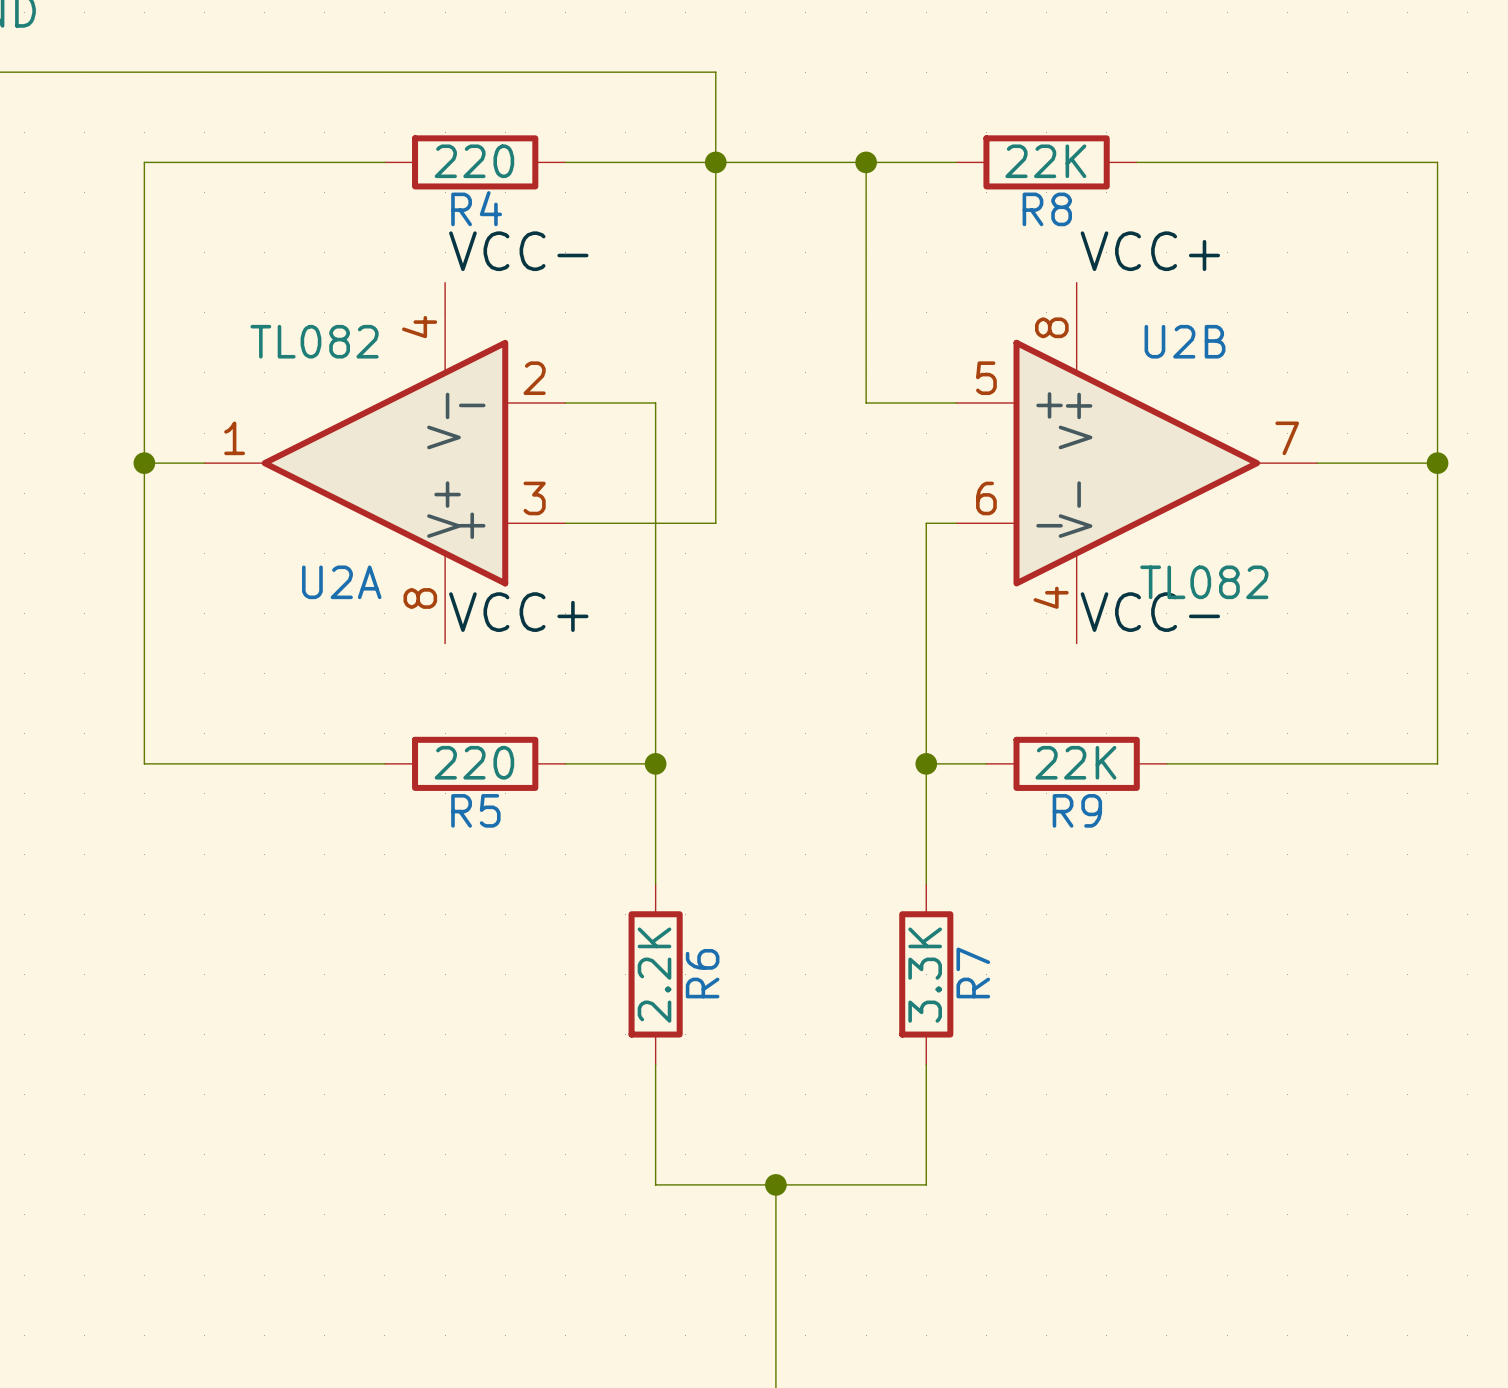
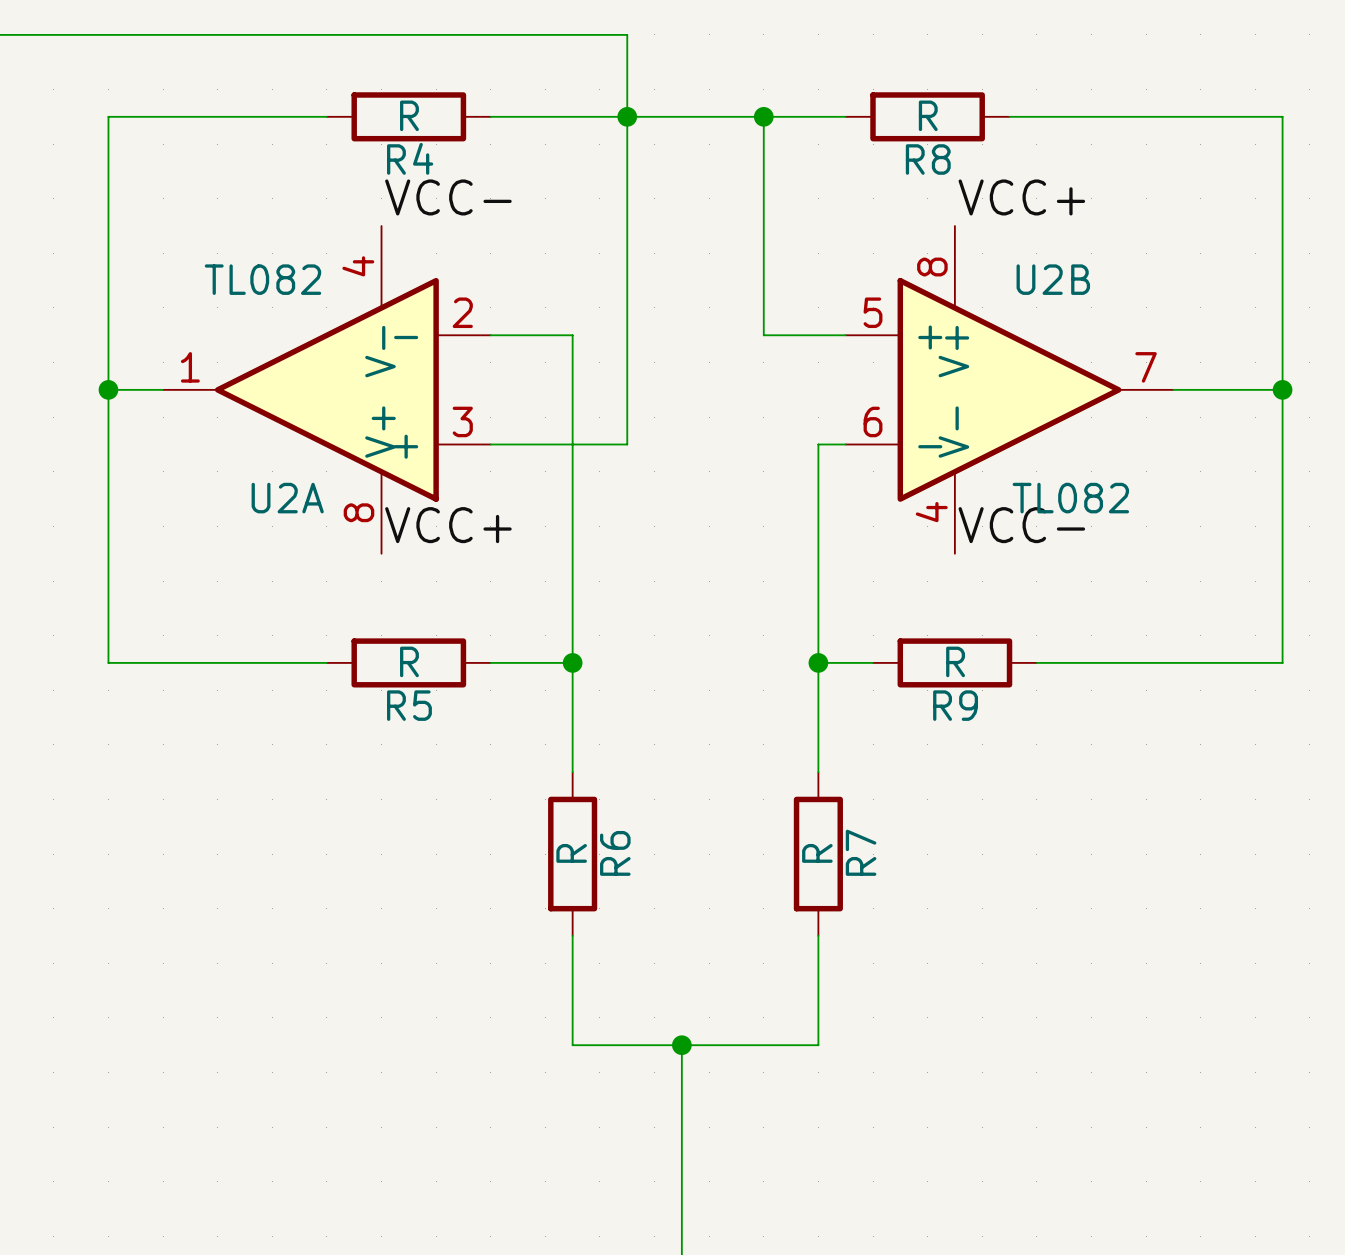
R4 value: 220 (474, 161) -> R (409, 115)
R8 value: 22K (1045, 161) -> R (928, 115)
R5 value: 220 (474, 762) -> R (409, 661)
R9 value: 22K (1075, 762) -> R (955, 661)
R6 value: 2.2K (654, 975) -> R (571, 853)
R7 value: 3.3K (925, 975) -> R (817, 853)

